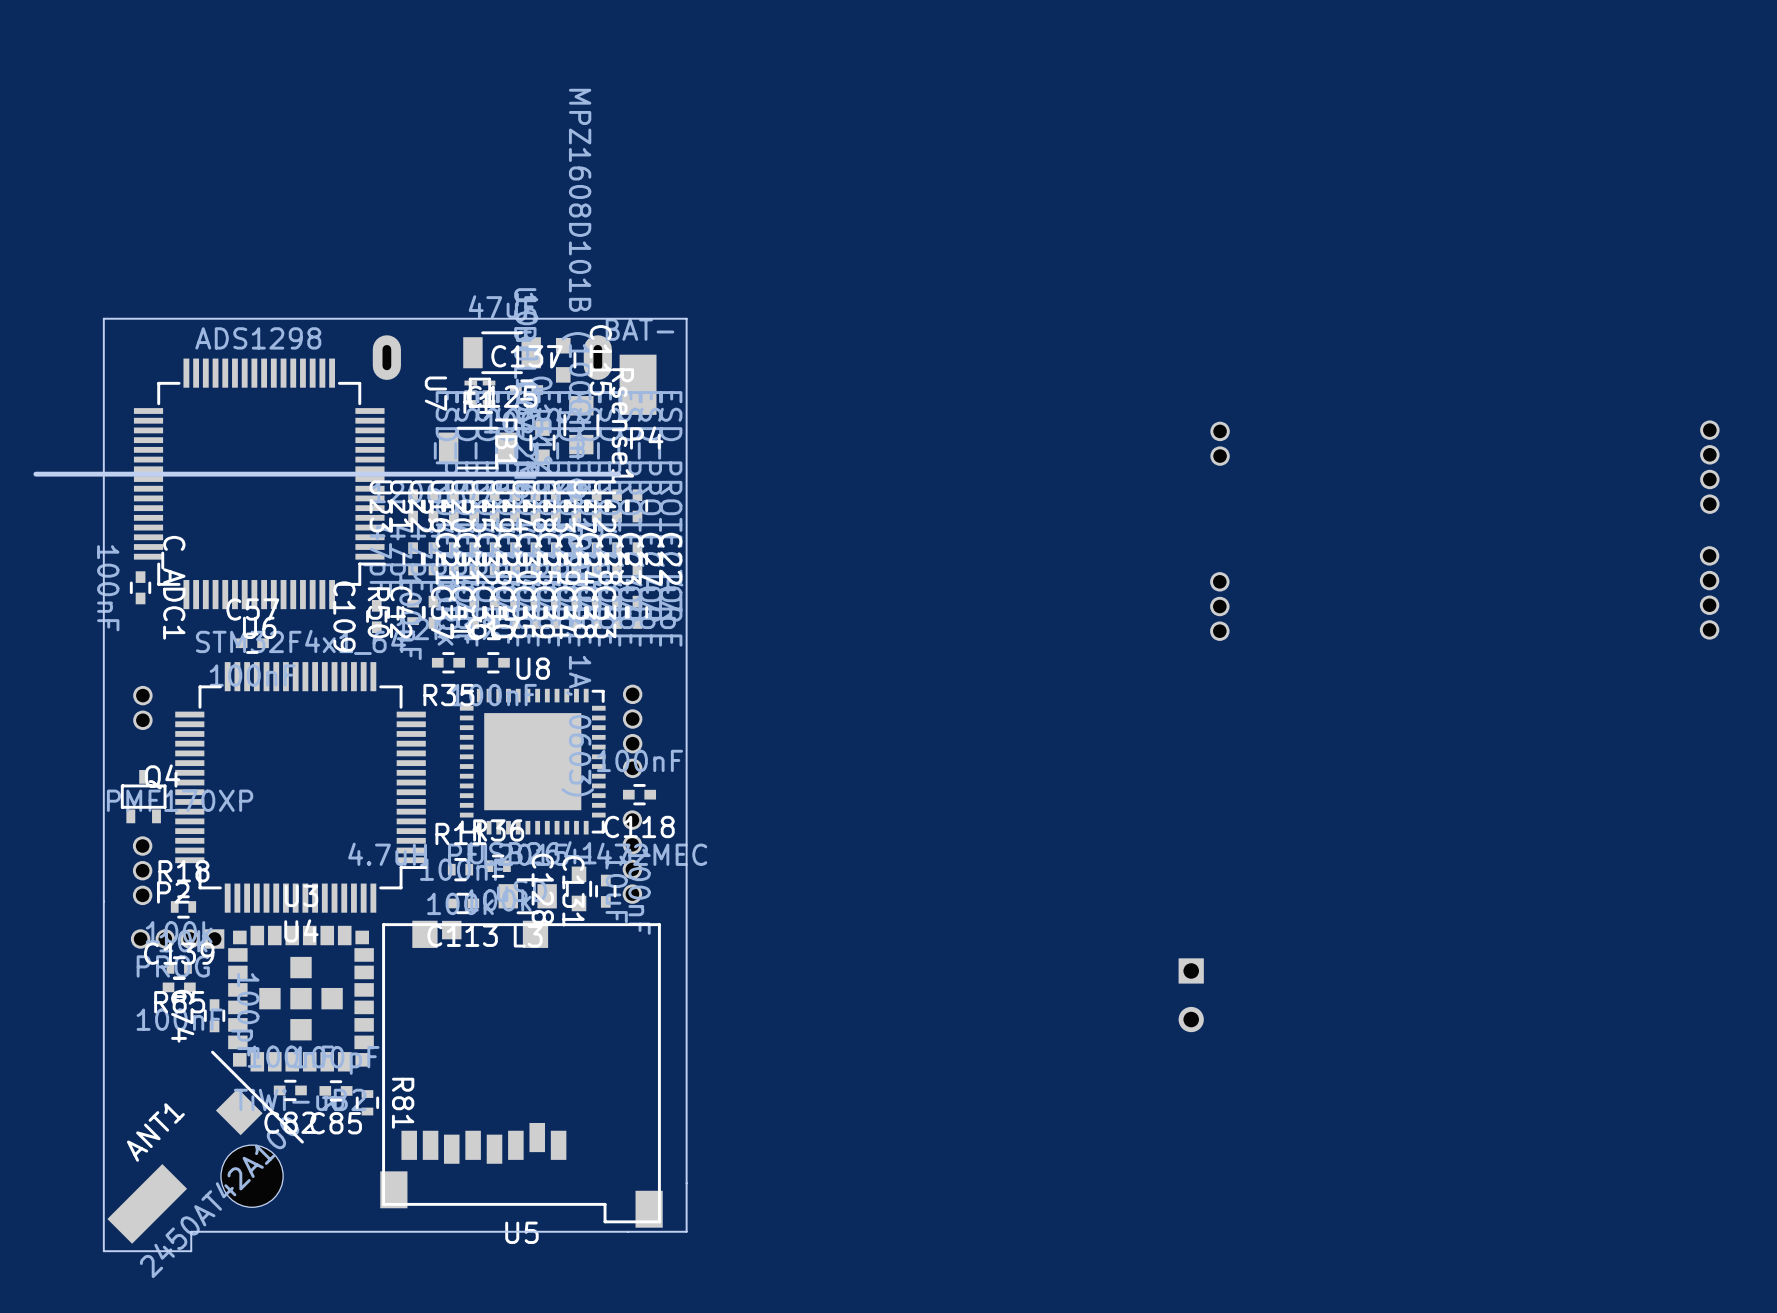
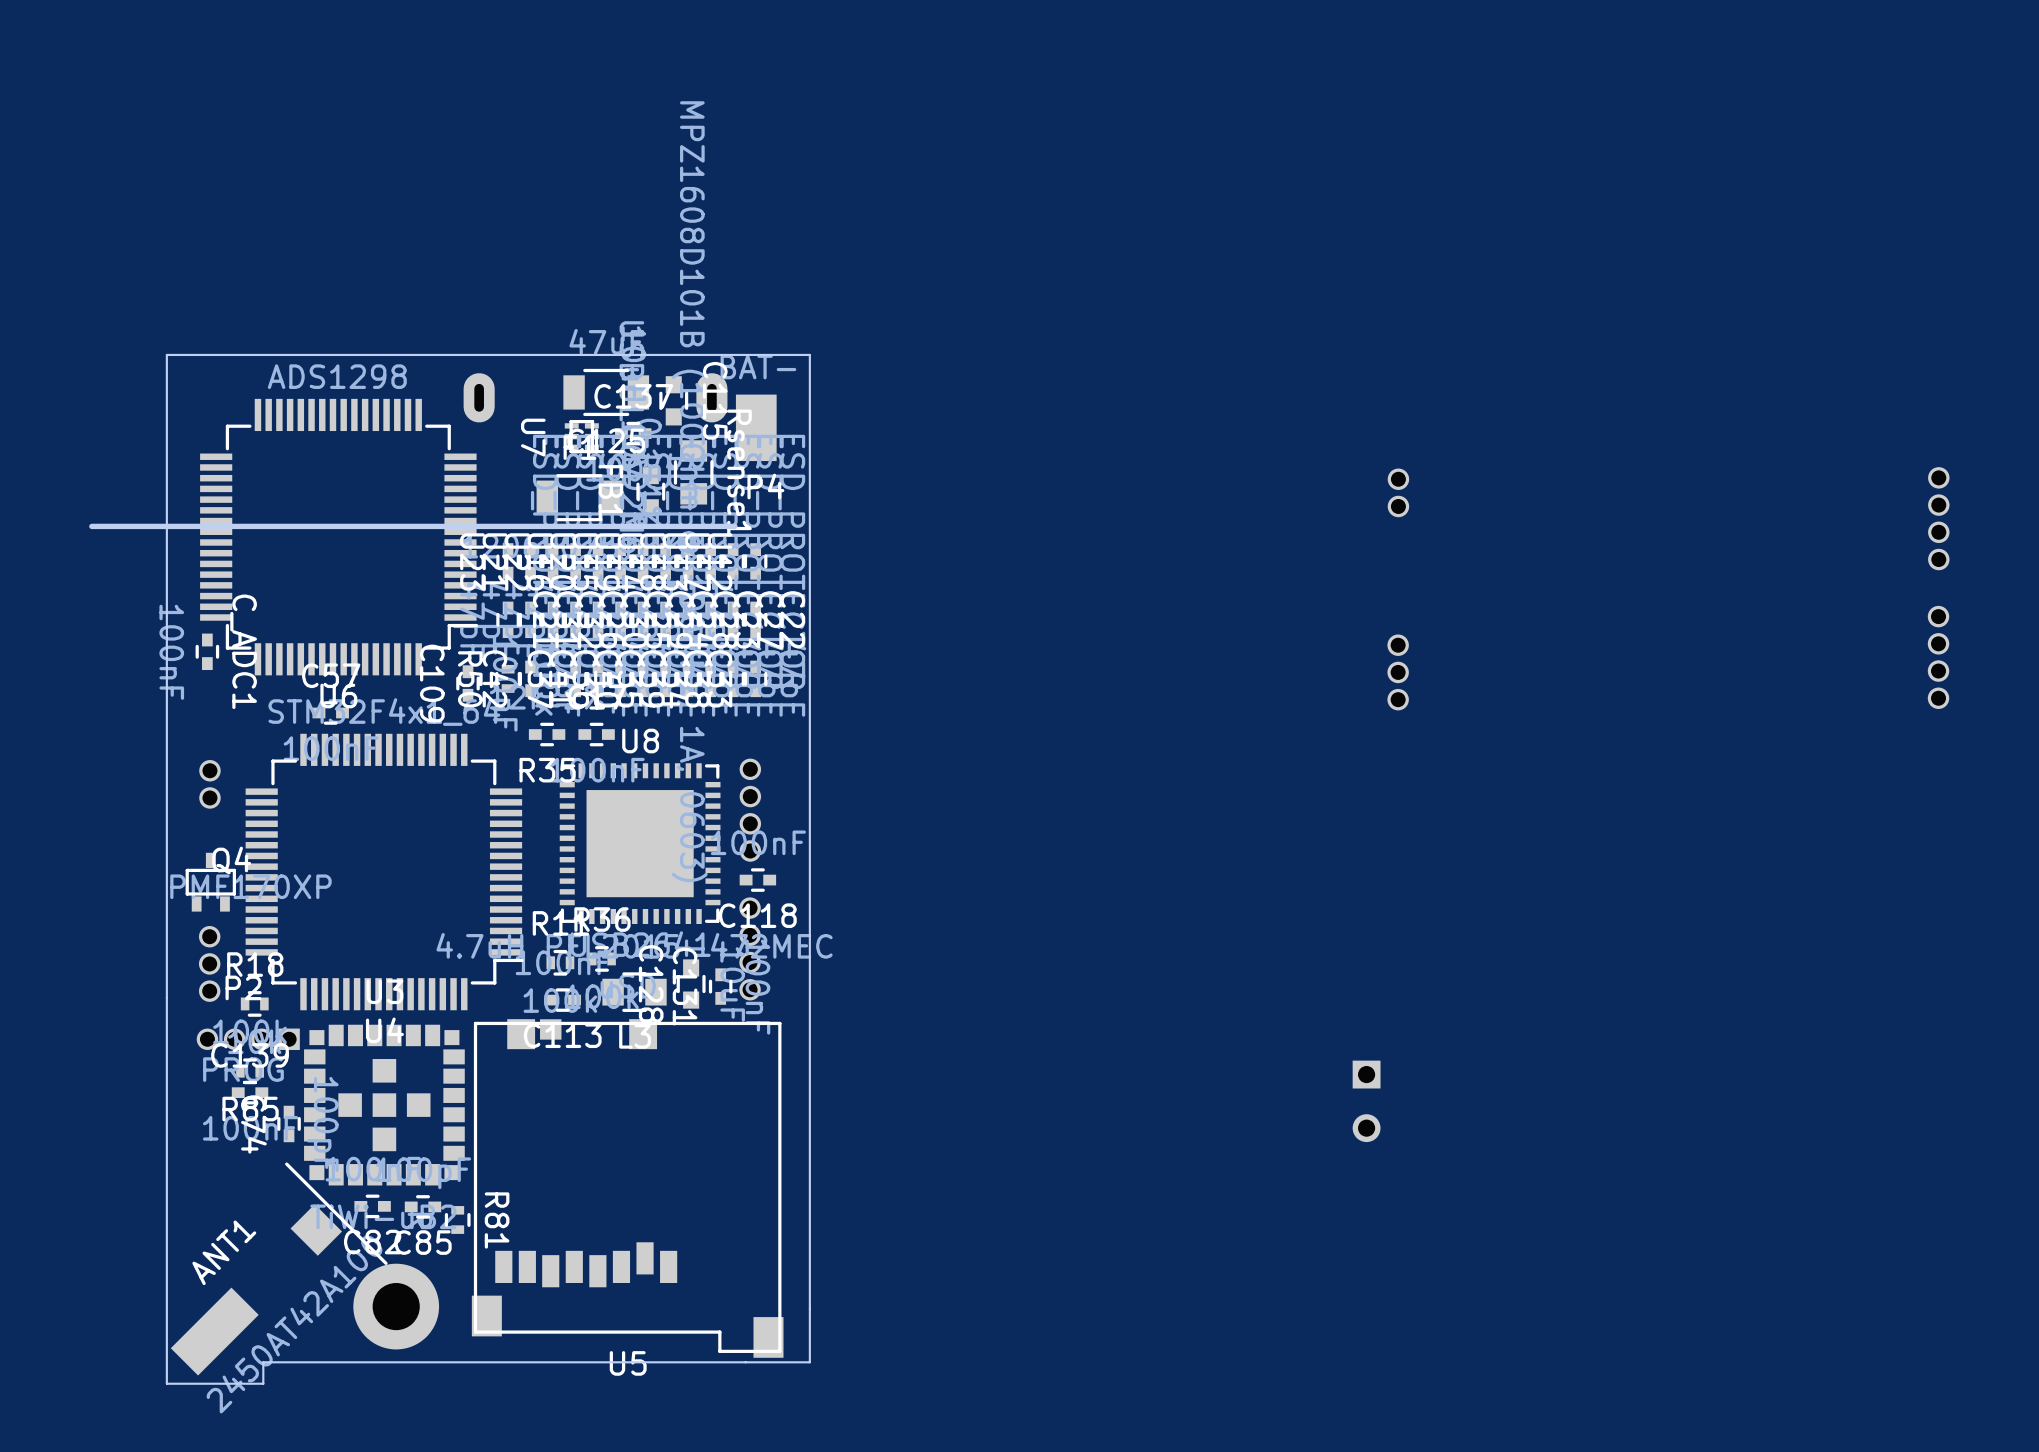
part: (252, 1176) -> none
part: none -> (396, 1306)

